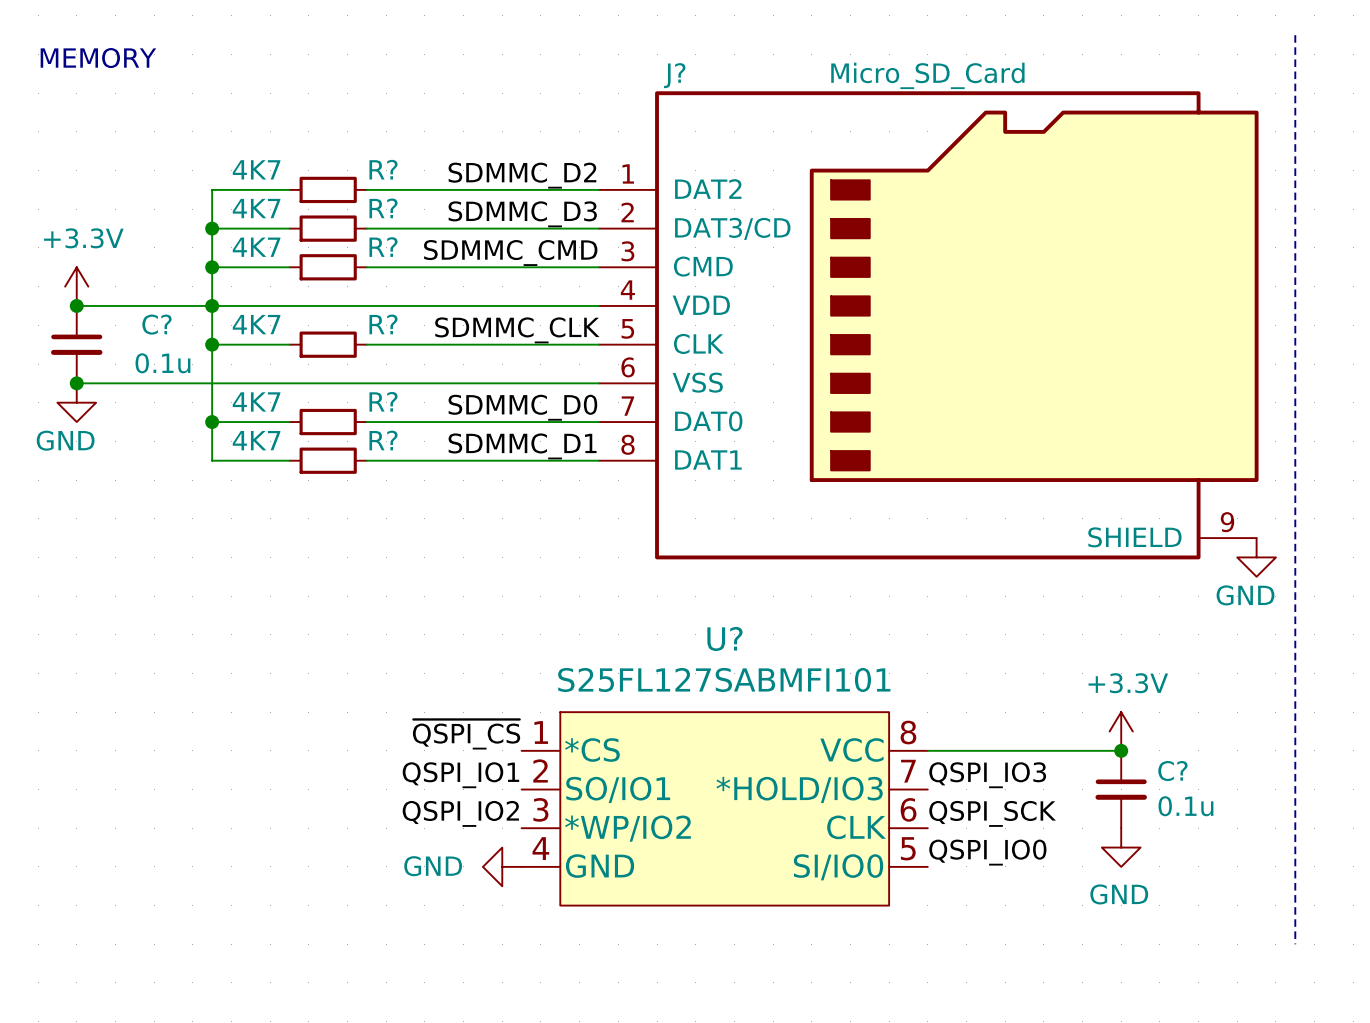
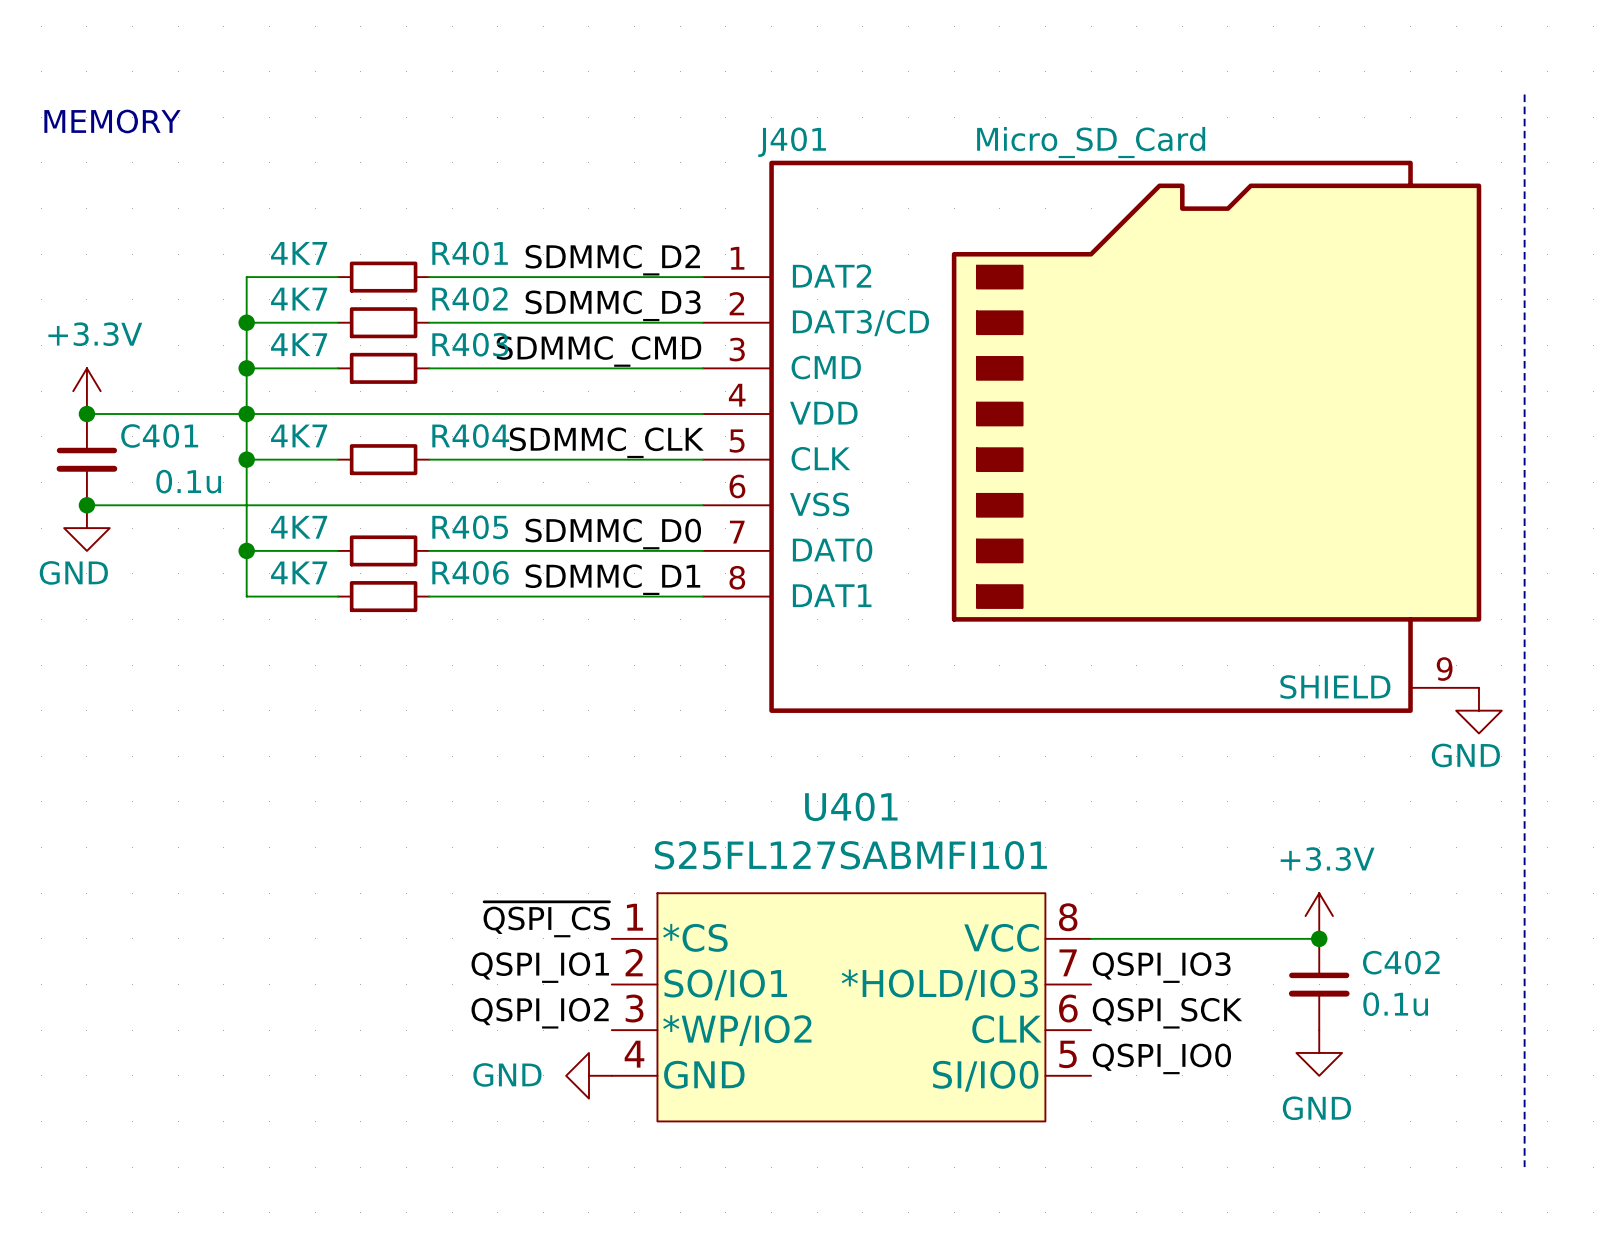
J? name: J? (674, 75) -> J401 (792, 142)
R? name: R? (383, 169) -> R401 (470, 253)
R? name: R? (383, 208) -> R402 (469, 299)
R? name: R? (383, 247) -> R403 (470, 344)
C? name: C? (156, 324) -> C401 (159, 435)
R? name: R? (383, 324) -> R404 (470, 435)
R? name: R? (383, 401) -> R405 (470, 527)
R? name: R? (383, 440) -> R406 (470, 572)
U? name: U? (724, 638) -> U401 (851, 806)
C? name: C? (1172, 771) -> C402 (1401, 962)

